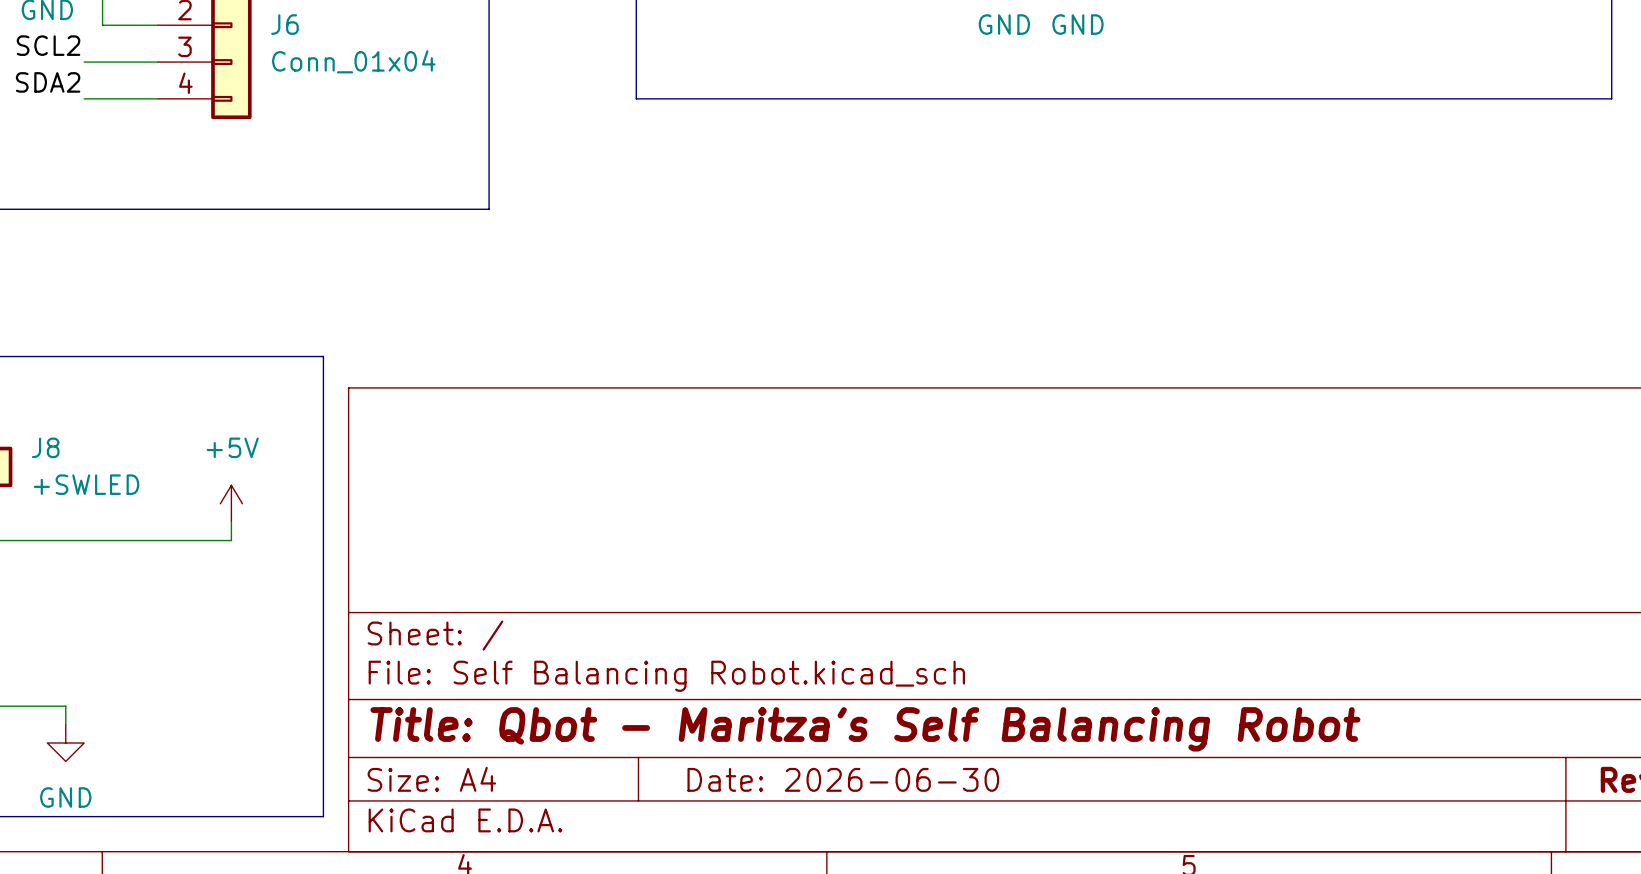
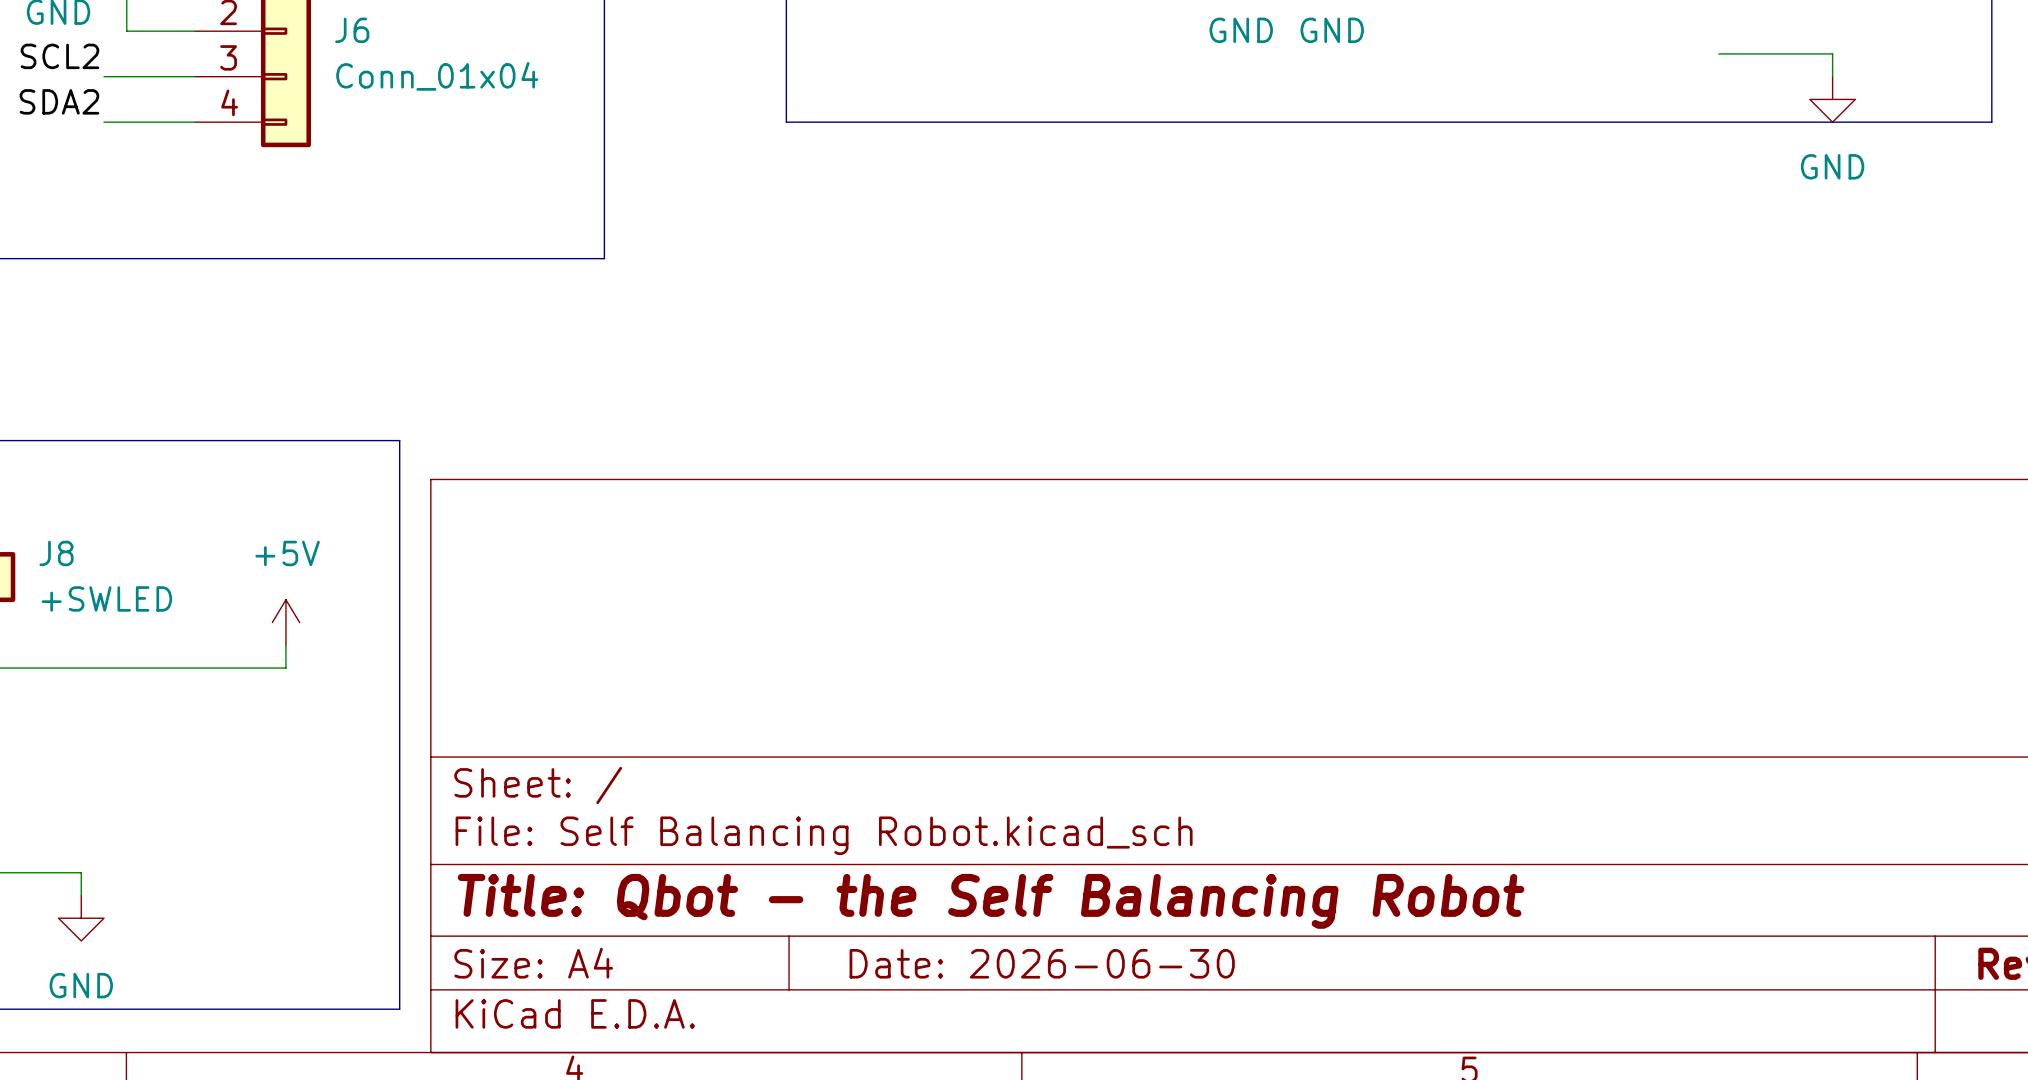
wire: none -> (1718, 53) (1832, 53) (1832, 76)
power symbol: none -> GND (1832, 99)
title block: Title: Qbot - Maritza's Self Balancing Robot (865, 729) -> Title: Qbot - the Self Balancing Robot (991, 901)

